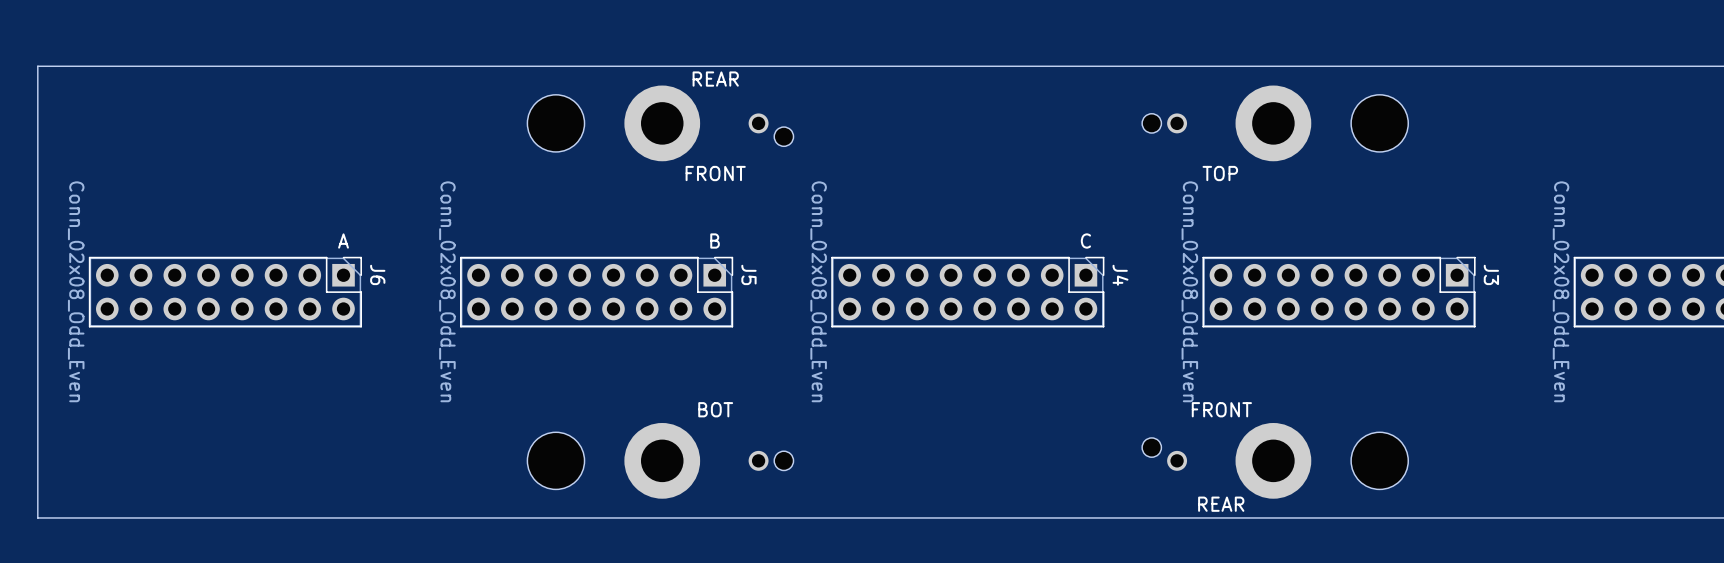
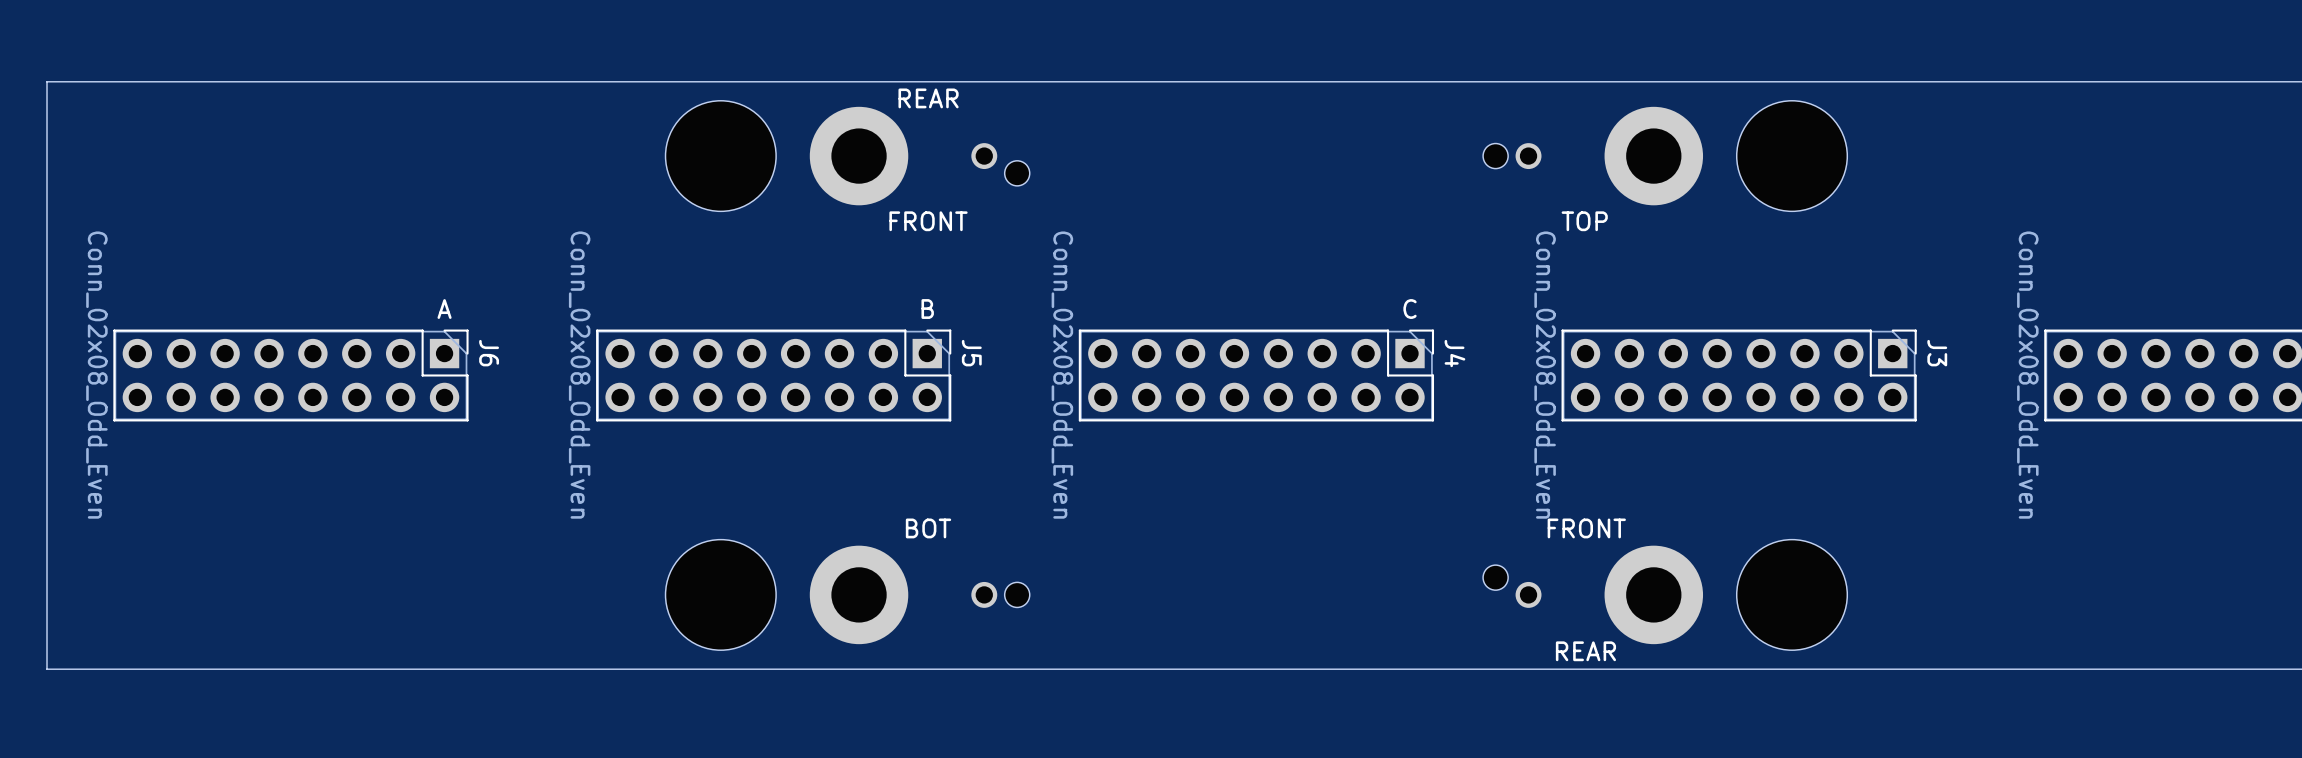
part footprint: [527, 94, 585, 152] -> [665, 100, 777, 212]
part footprint: [1351, 94, 1409, 152] -> [1736, 100, 1848, 212]
part footprint: [527, 432, 585, 490] -> [665, 539, 777, 651]
part footprint: [1351, 432, 1409, 490] -> [1736, 539, 1848, 651]

